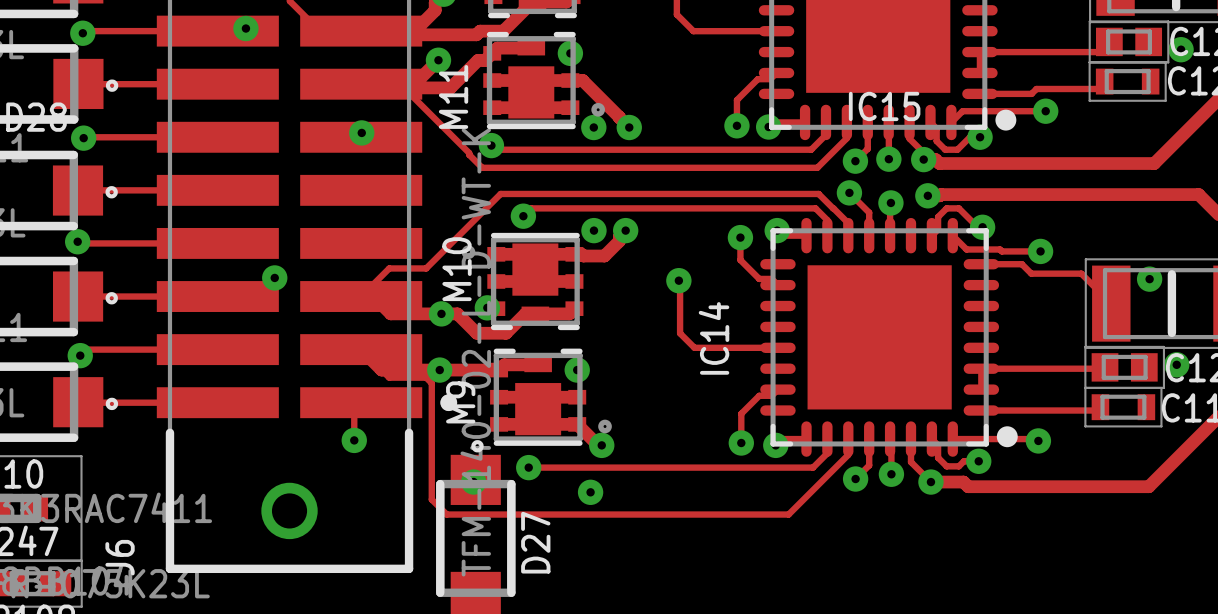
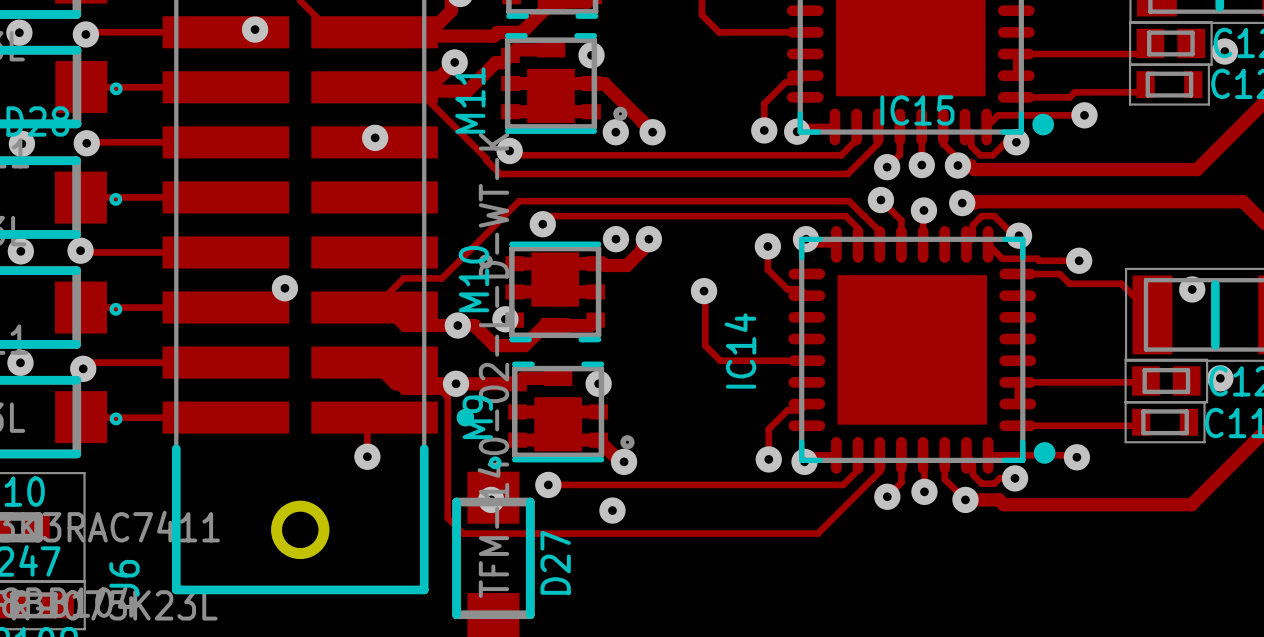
via: none -> (19, 32)
via: none -> (21, 143)
via: none -> (20, 251)
via: none -> (20, 362)

